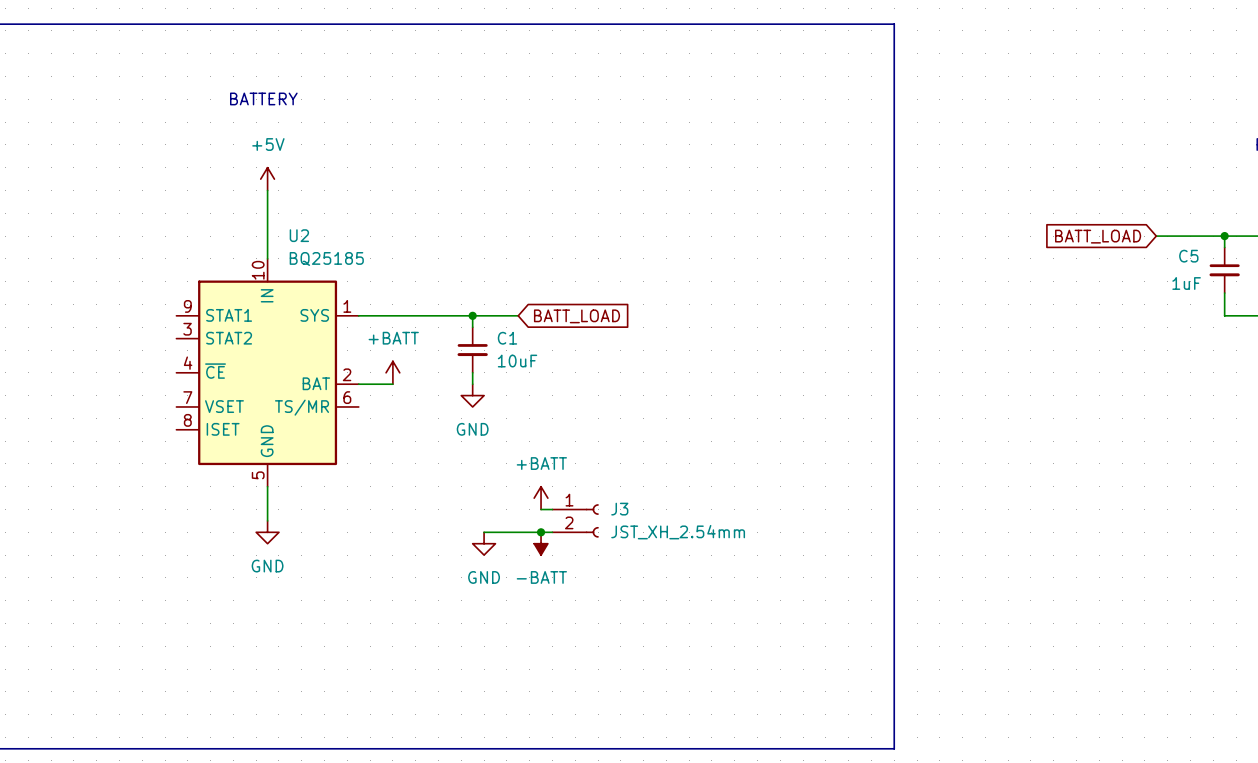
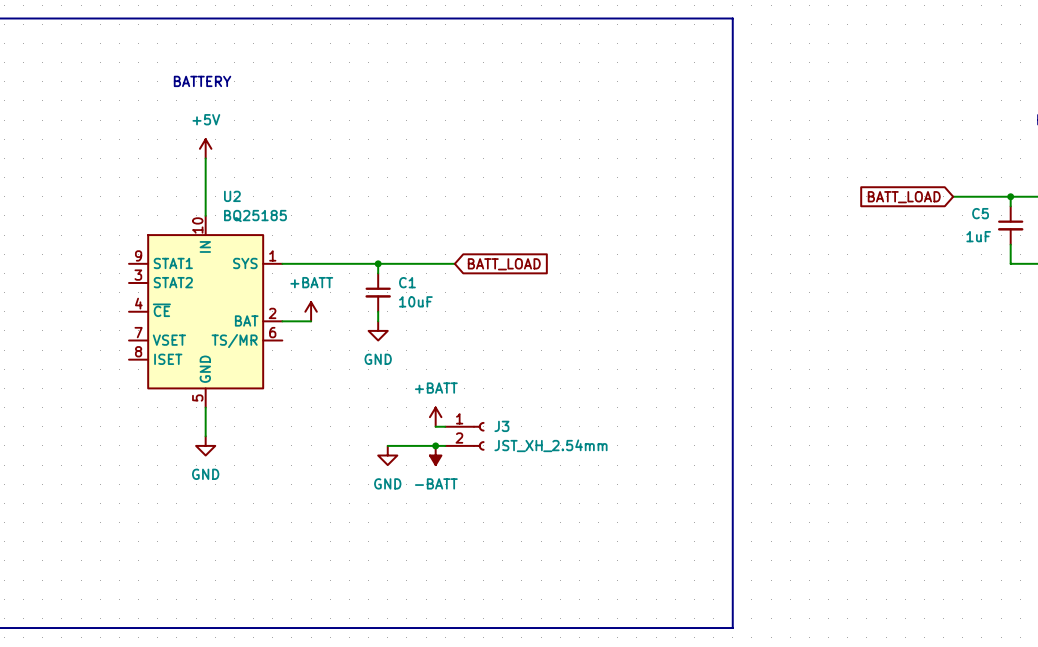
wire: none -> (416, 263) (454, 263)
global label position: BATT_LOAD (576, 316) -> BATT_LOAD (504, 264)

